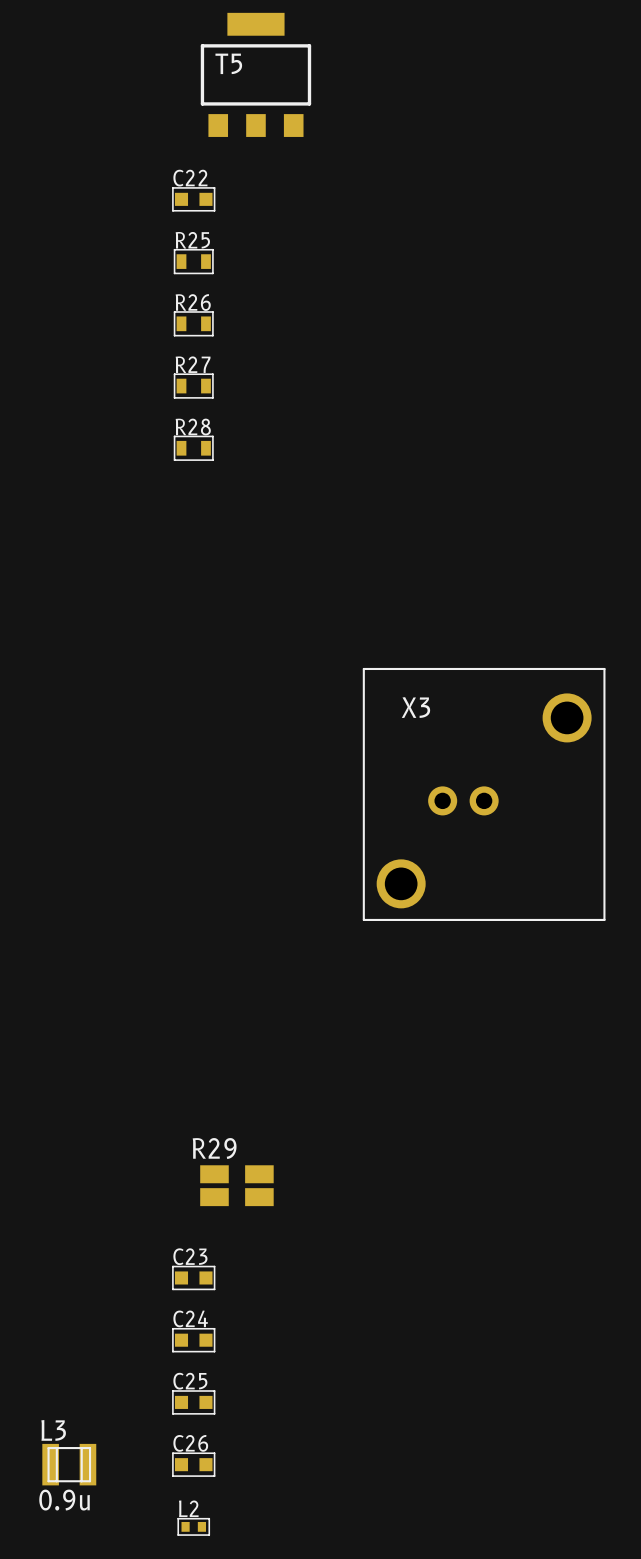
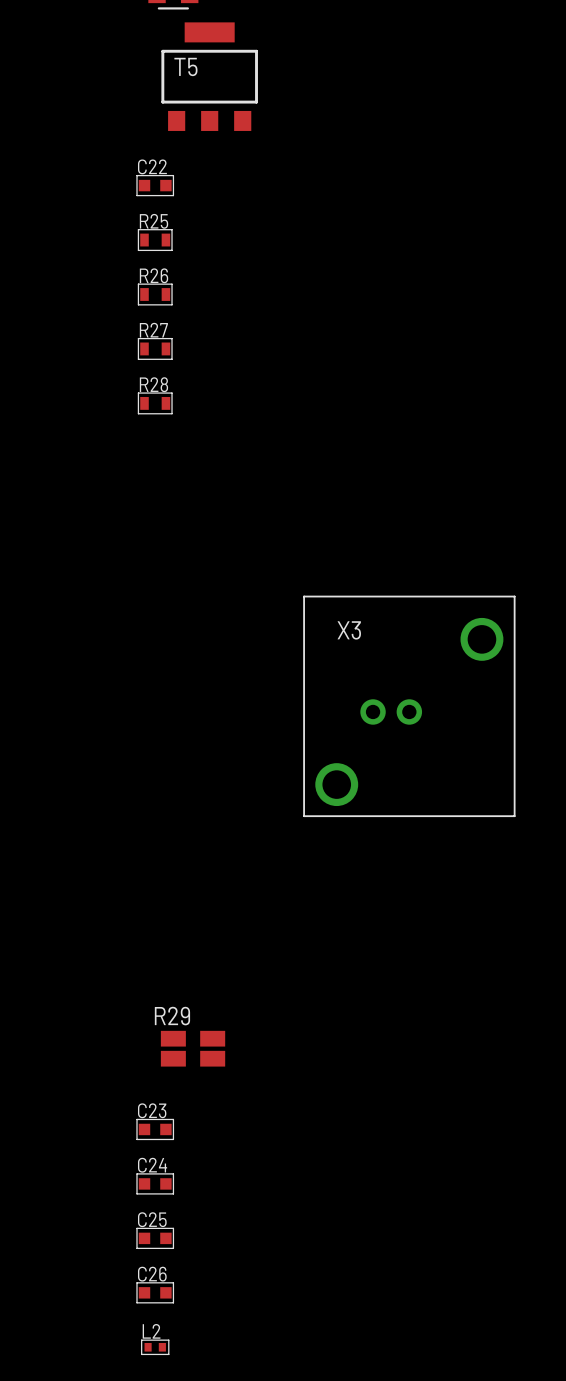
L3: 0.9u (69, 1464) -> none

